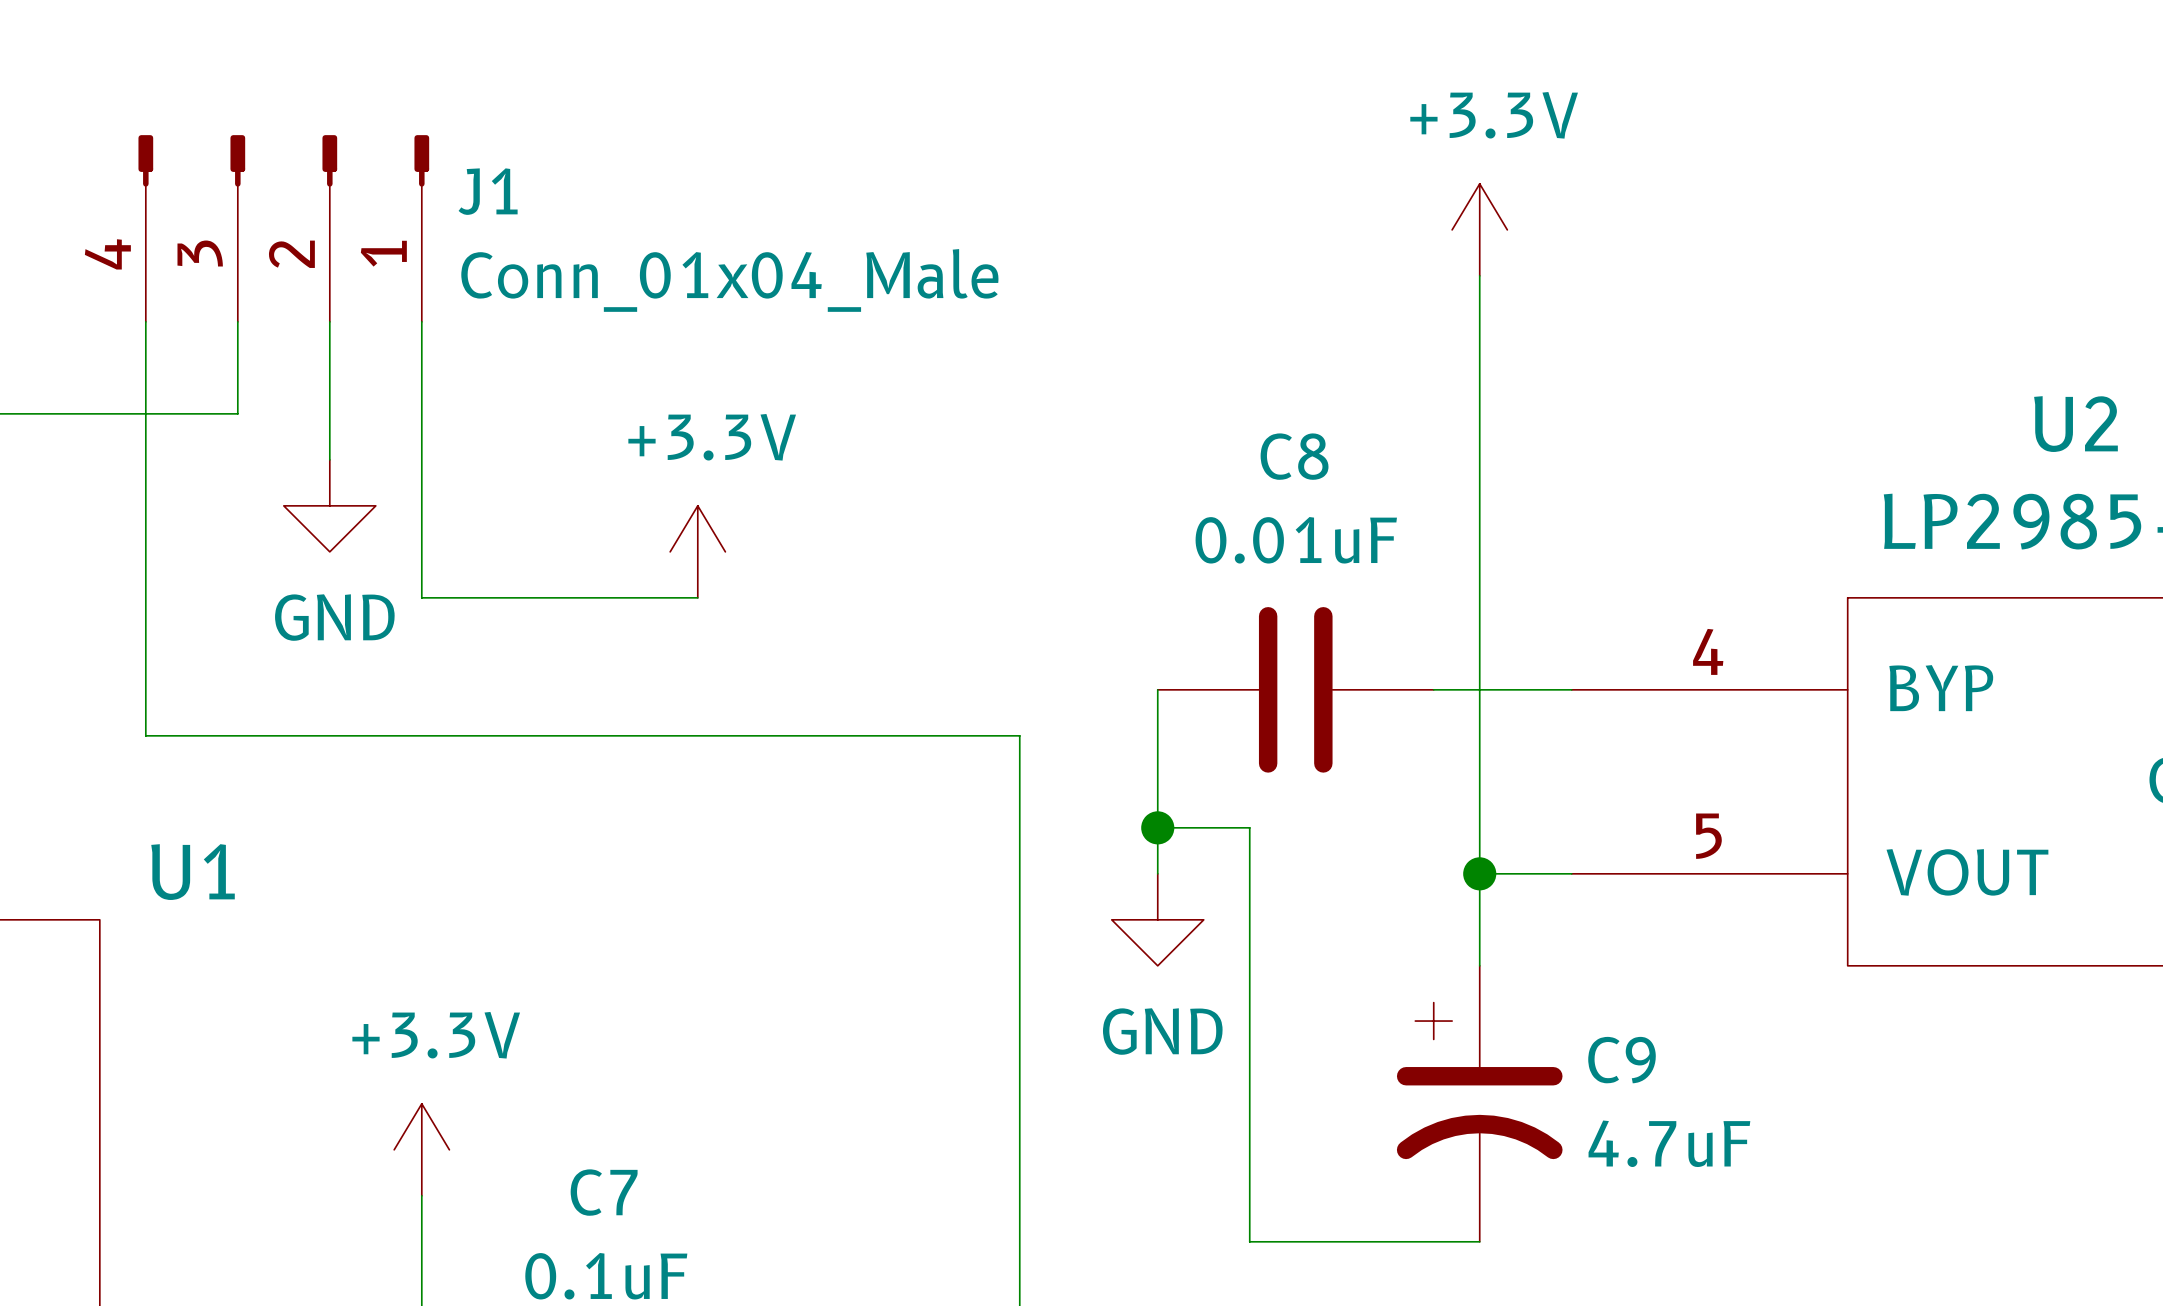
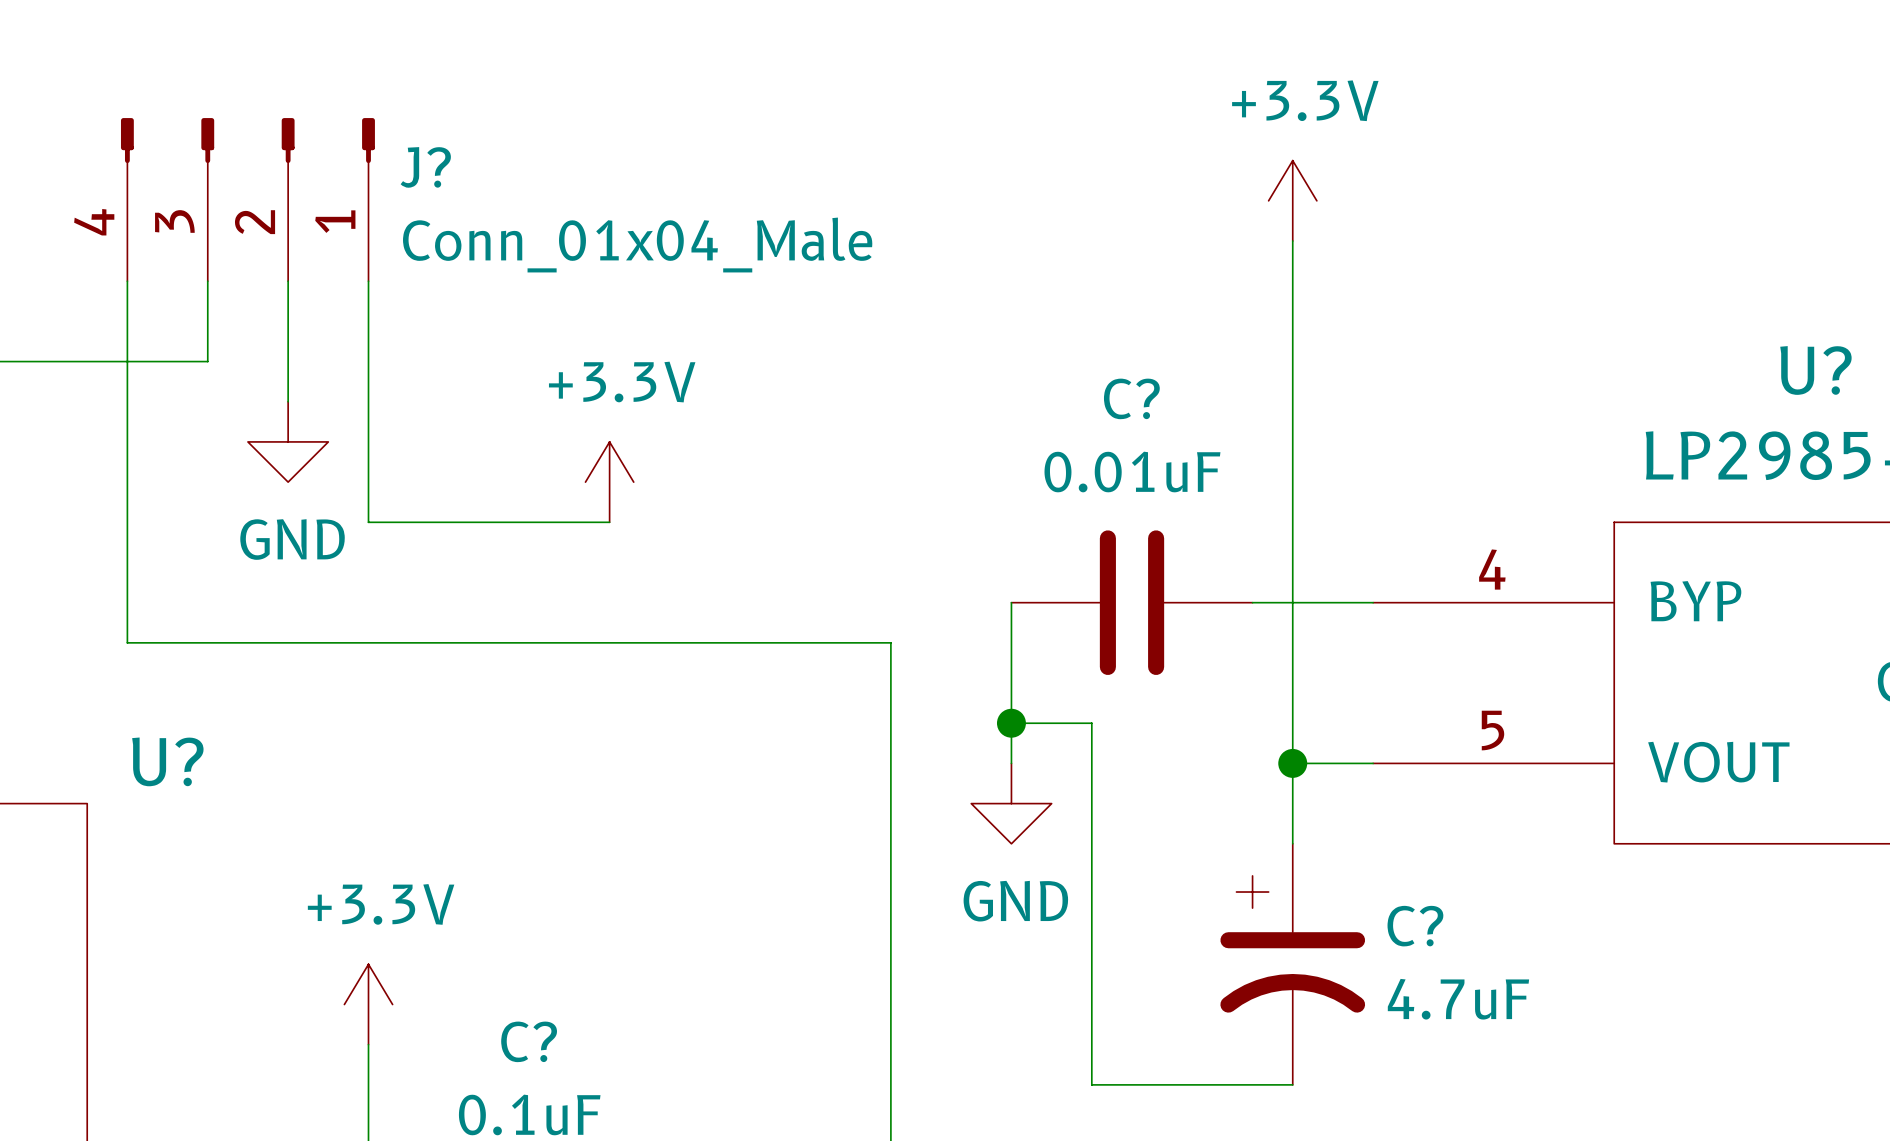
J1 name: J1 (488, 191) -> J? (425, 167)
U2 name: U2 (2075, 424) -> U? (1815, 370)
C8 name: C8 (1294, 456) -> C? (1131, 398)
U1 name: U1 (193, 872) -> U? (167, 761)
C9 name: C9 (1622, 1060) -> C? (1415, 926)
C7 name: C7 (604, 1192) -> C? (529, 1041)

